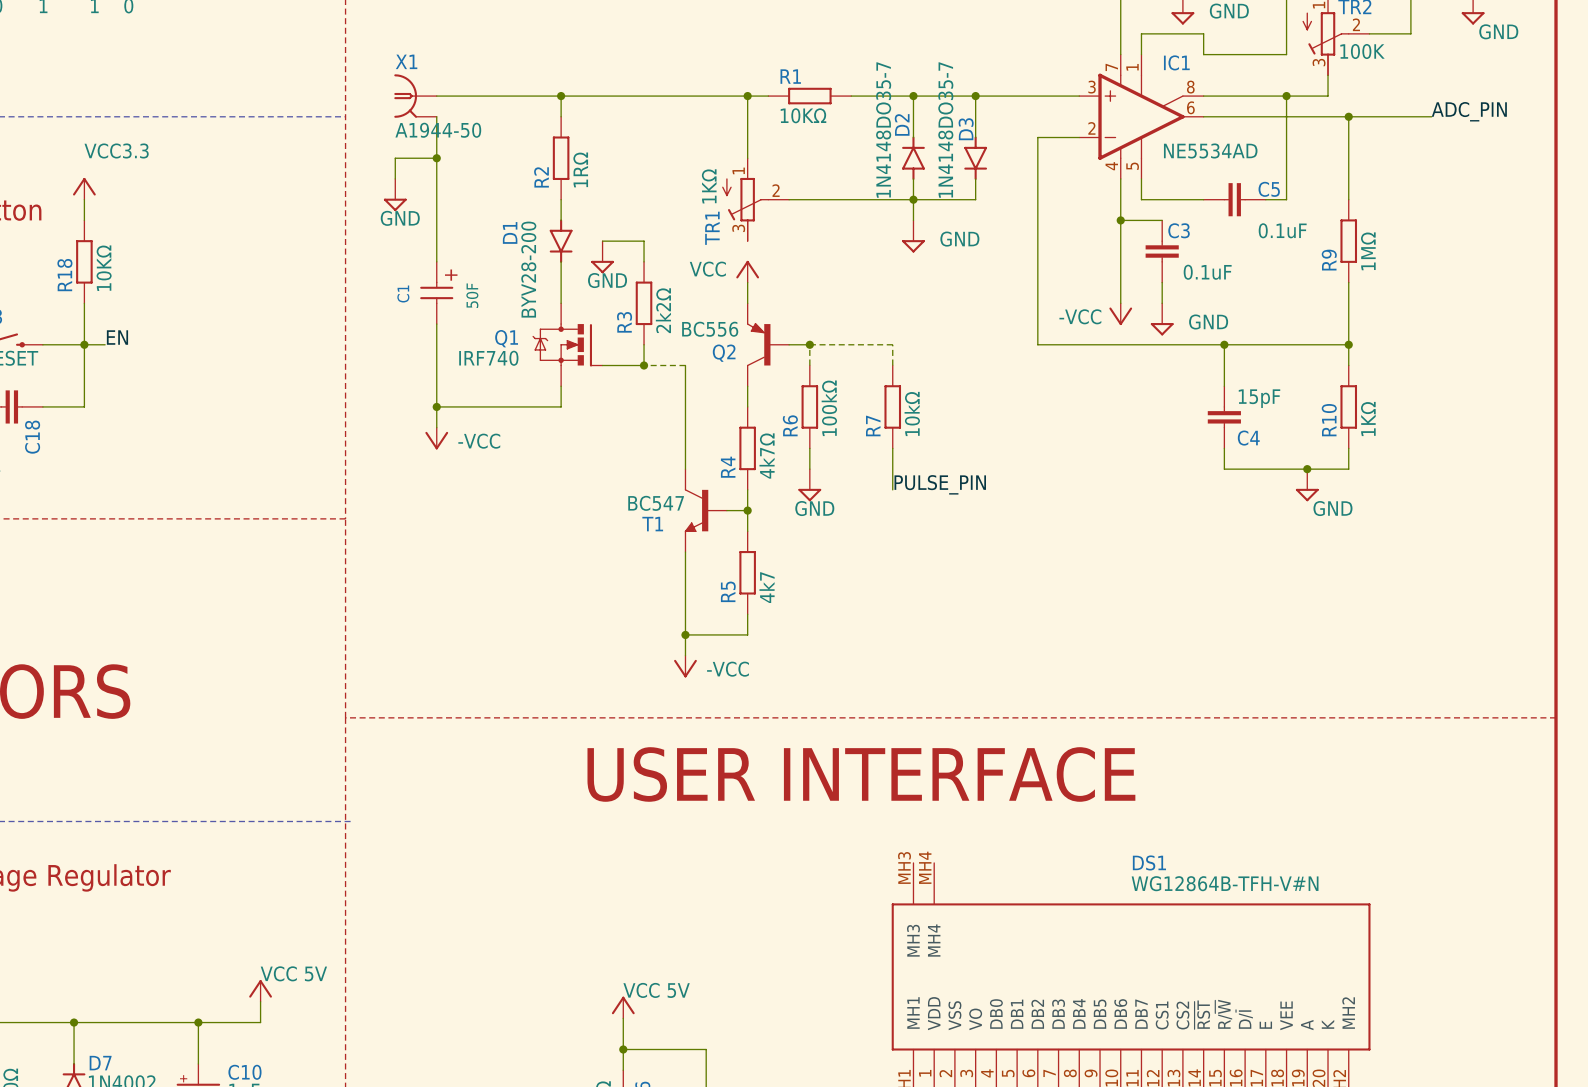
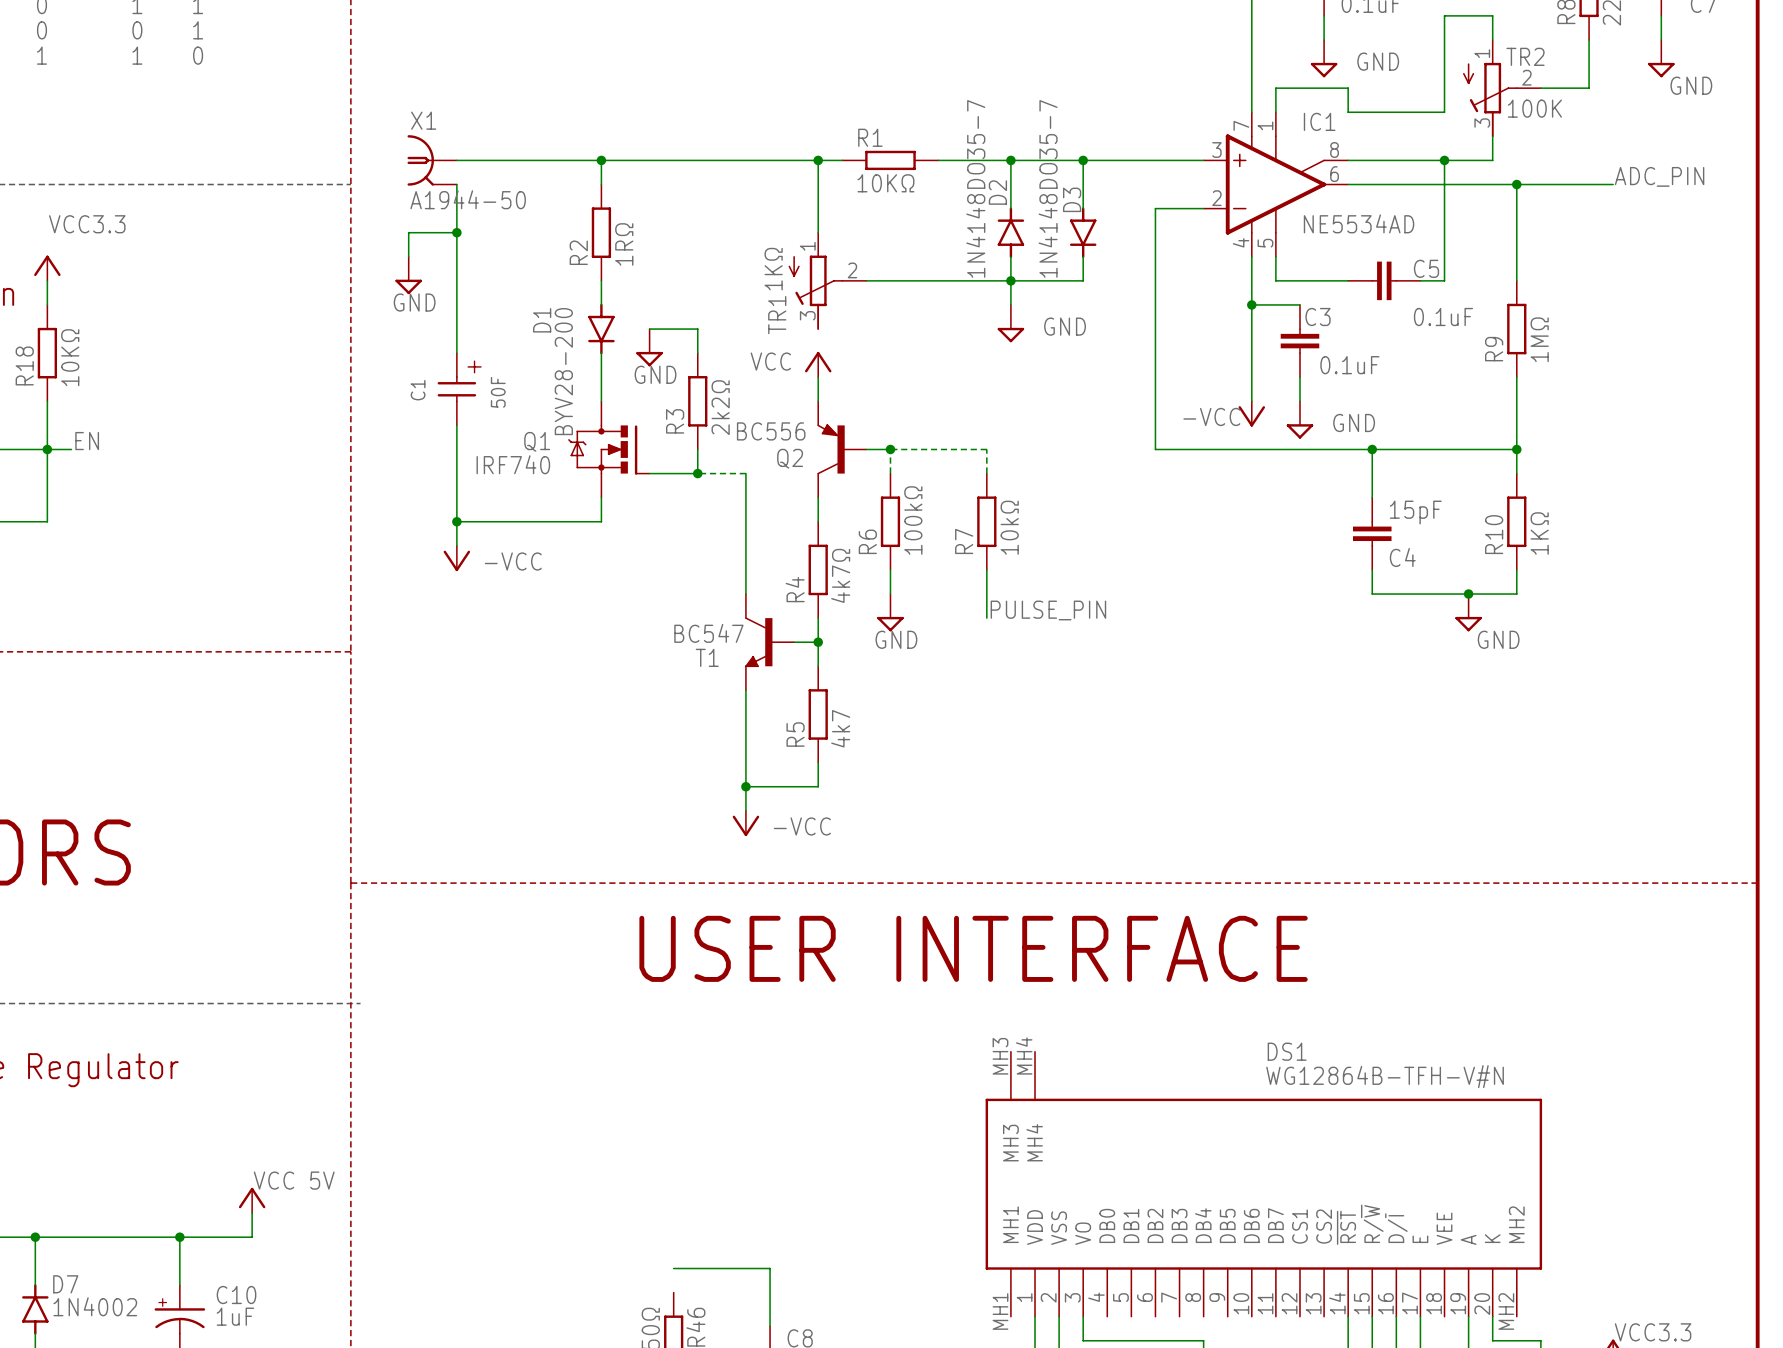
power symbol: VCC 5V (623, 1007) -> none
wire: (623, 1018) (623, 1070) -> none
junction: (623, 1049) -> none

